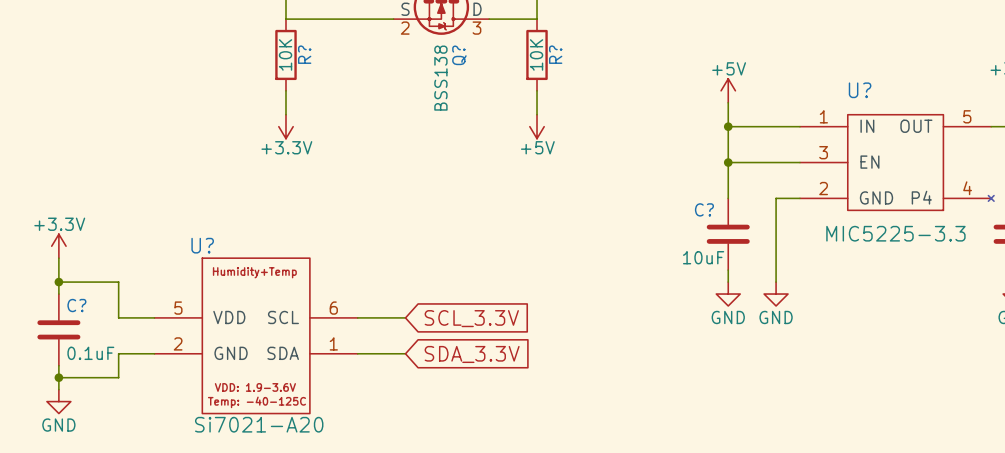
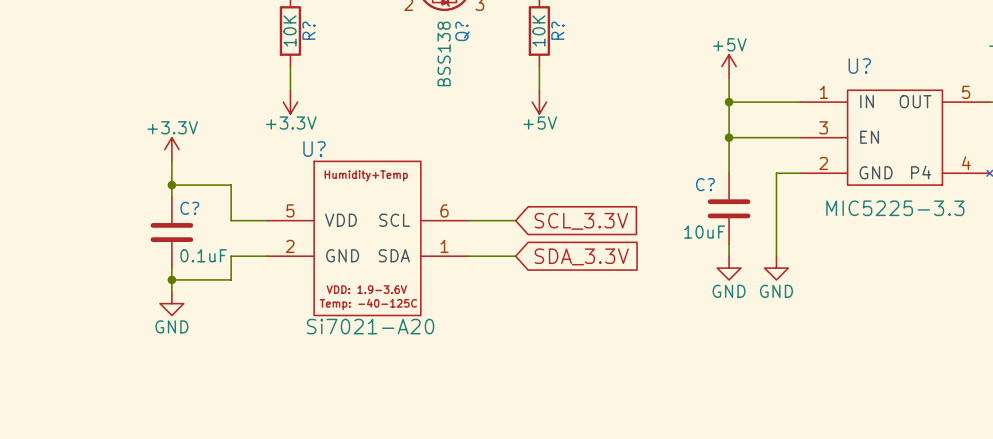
junction: none -> (171, 185)
power symbol position: +3.3V (58, 246) -> +3.3V (171, 149)
wire: (58, 258) (58, 294) -> (171, 161) (171, 196)
wire: (58, 282) (118, 282) (118, 317) (154, 317) -> (171, 185) (231, 185) (231, 220) (266, 220)
junction: (58, 282) -> none
junction: none -> (171, 279)
wire: (357, 317) (405, 317) -> (468, 220) (515, 220)
global label position: SCL_3.3V (471, 318) -> SCL_3.3V (581, 221)
C? position: (58, 329) -> (171, 232)
U? position: (256, 335) -> (367, 238)
wire: (154, 353) (118, 353) (118, 377) (58, 377) -> (266, 256) (231, 256) (231, 279) (171, 279)
wire: (357, 353) (405, 353) -> (468, 256) (515, 256)
global label position: SDA_3.3V (472, 354) -> SDA_3.3V (581, 256)
wire: (58, 365) (58, 389) -> (171, 268) (171, 291)
junction: (58, 377) -> none
power symbol position: GND (58, 401) -> GND (171, 303)

